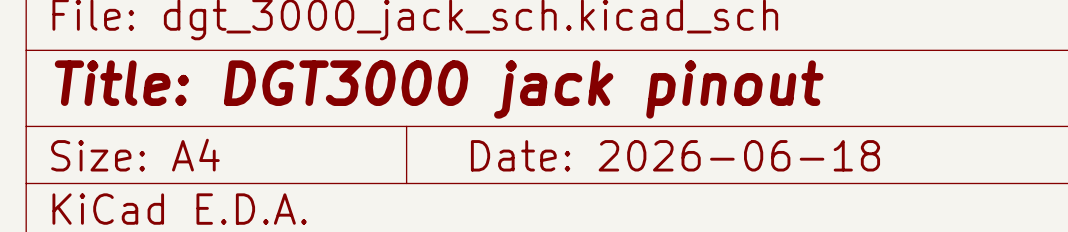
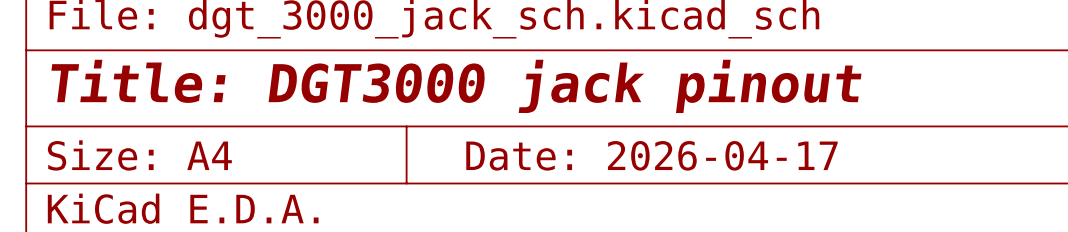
title block: Date: 2026-06-18 (675, 155) -> Date: 2026-04-17 (651, 155)

